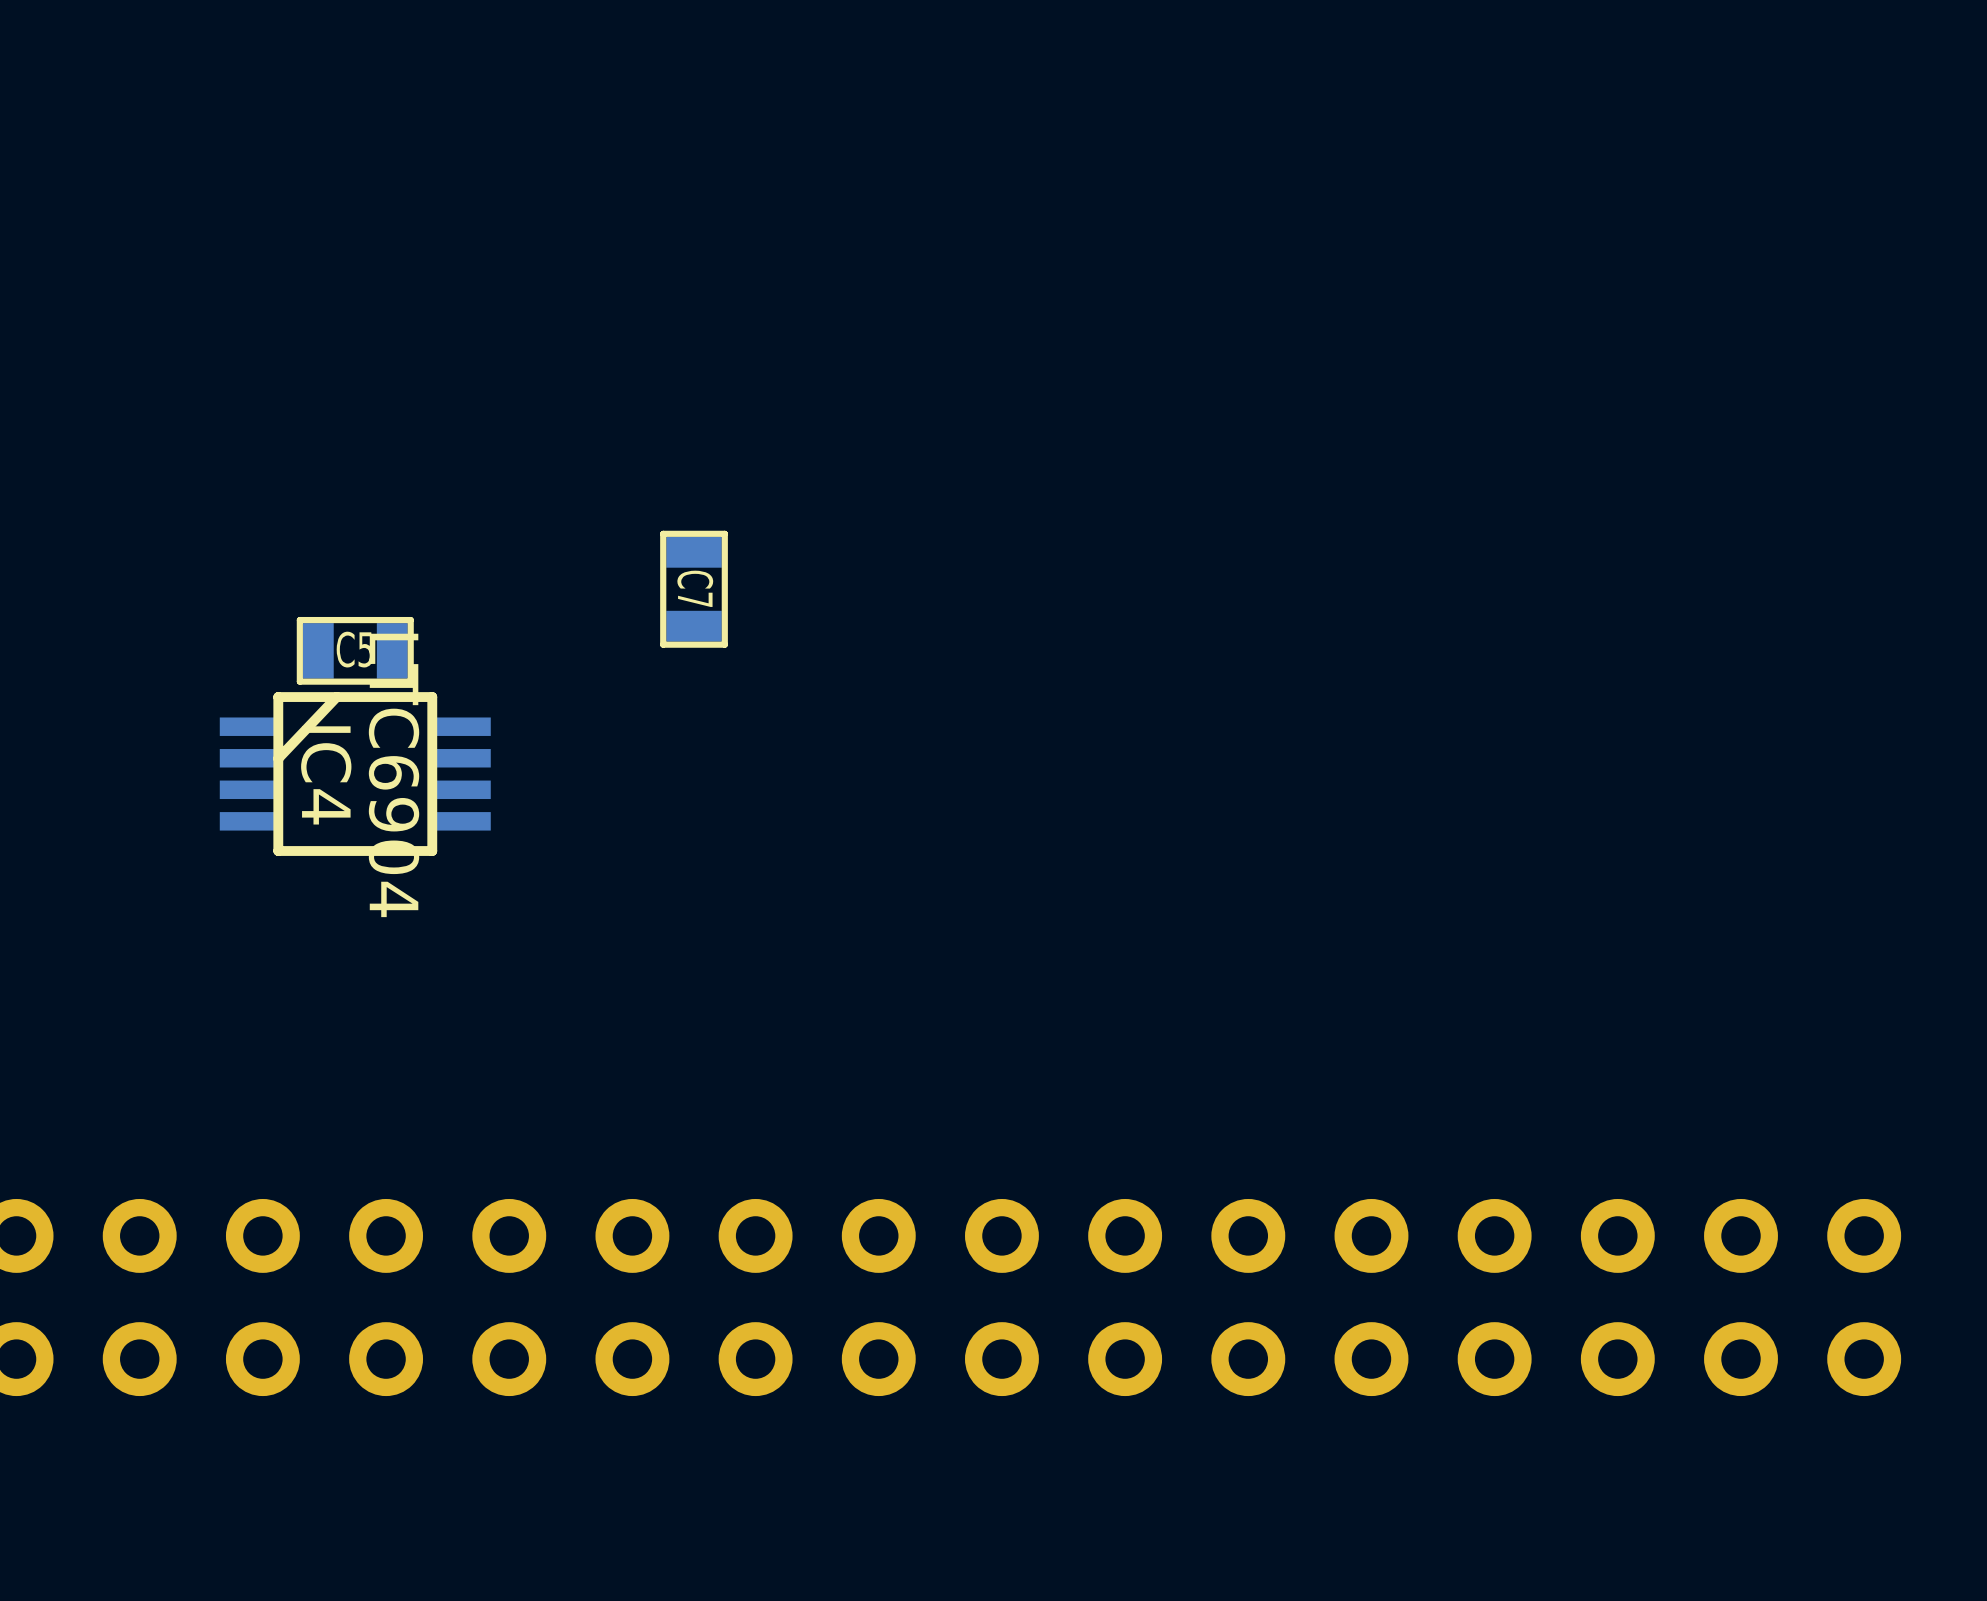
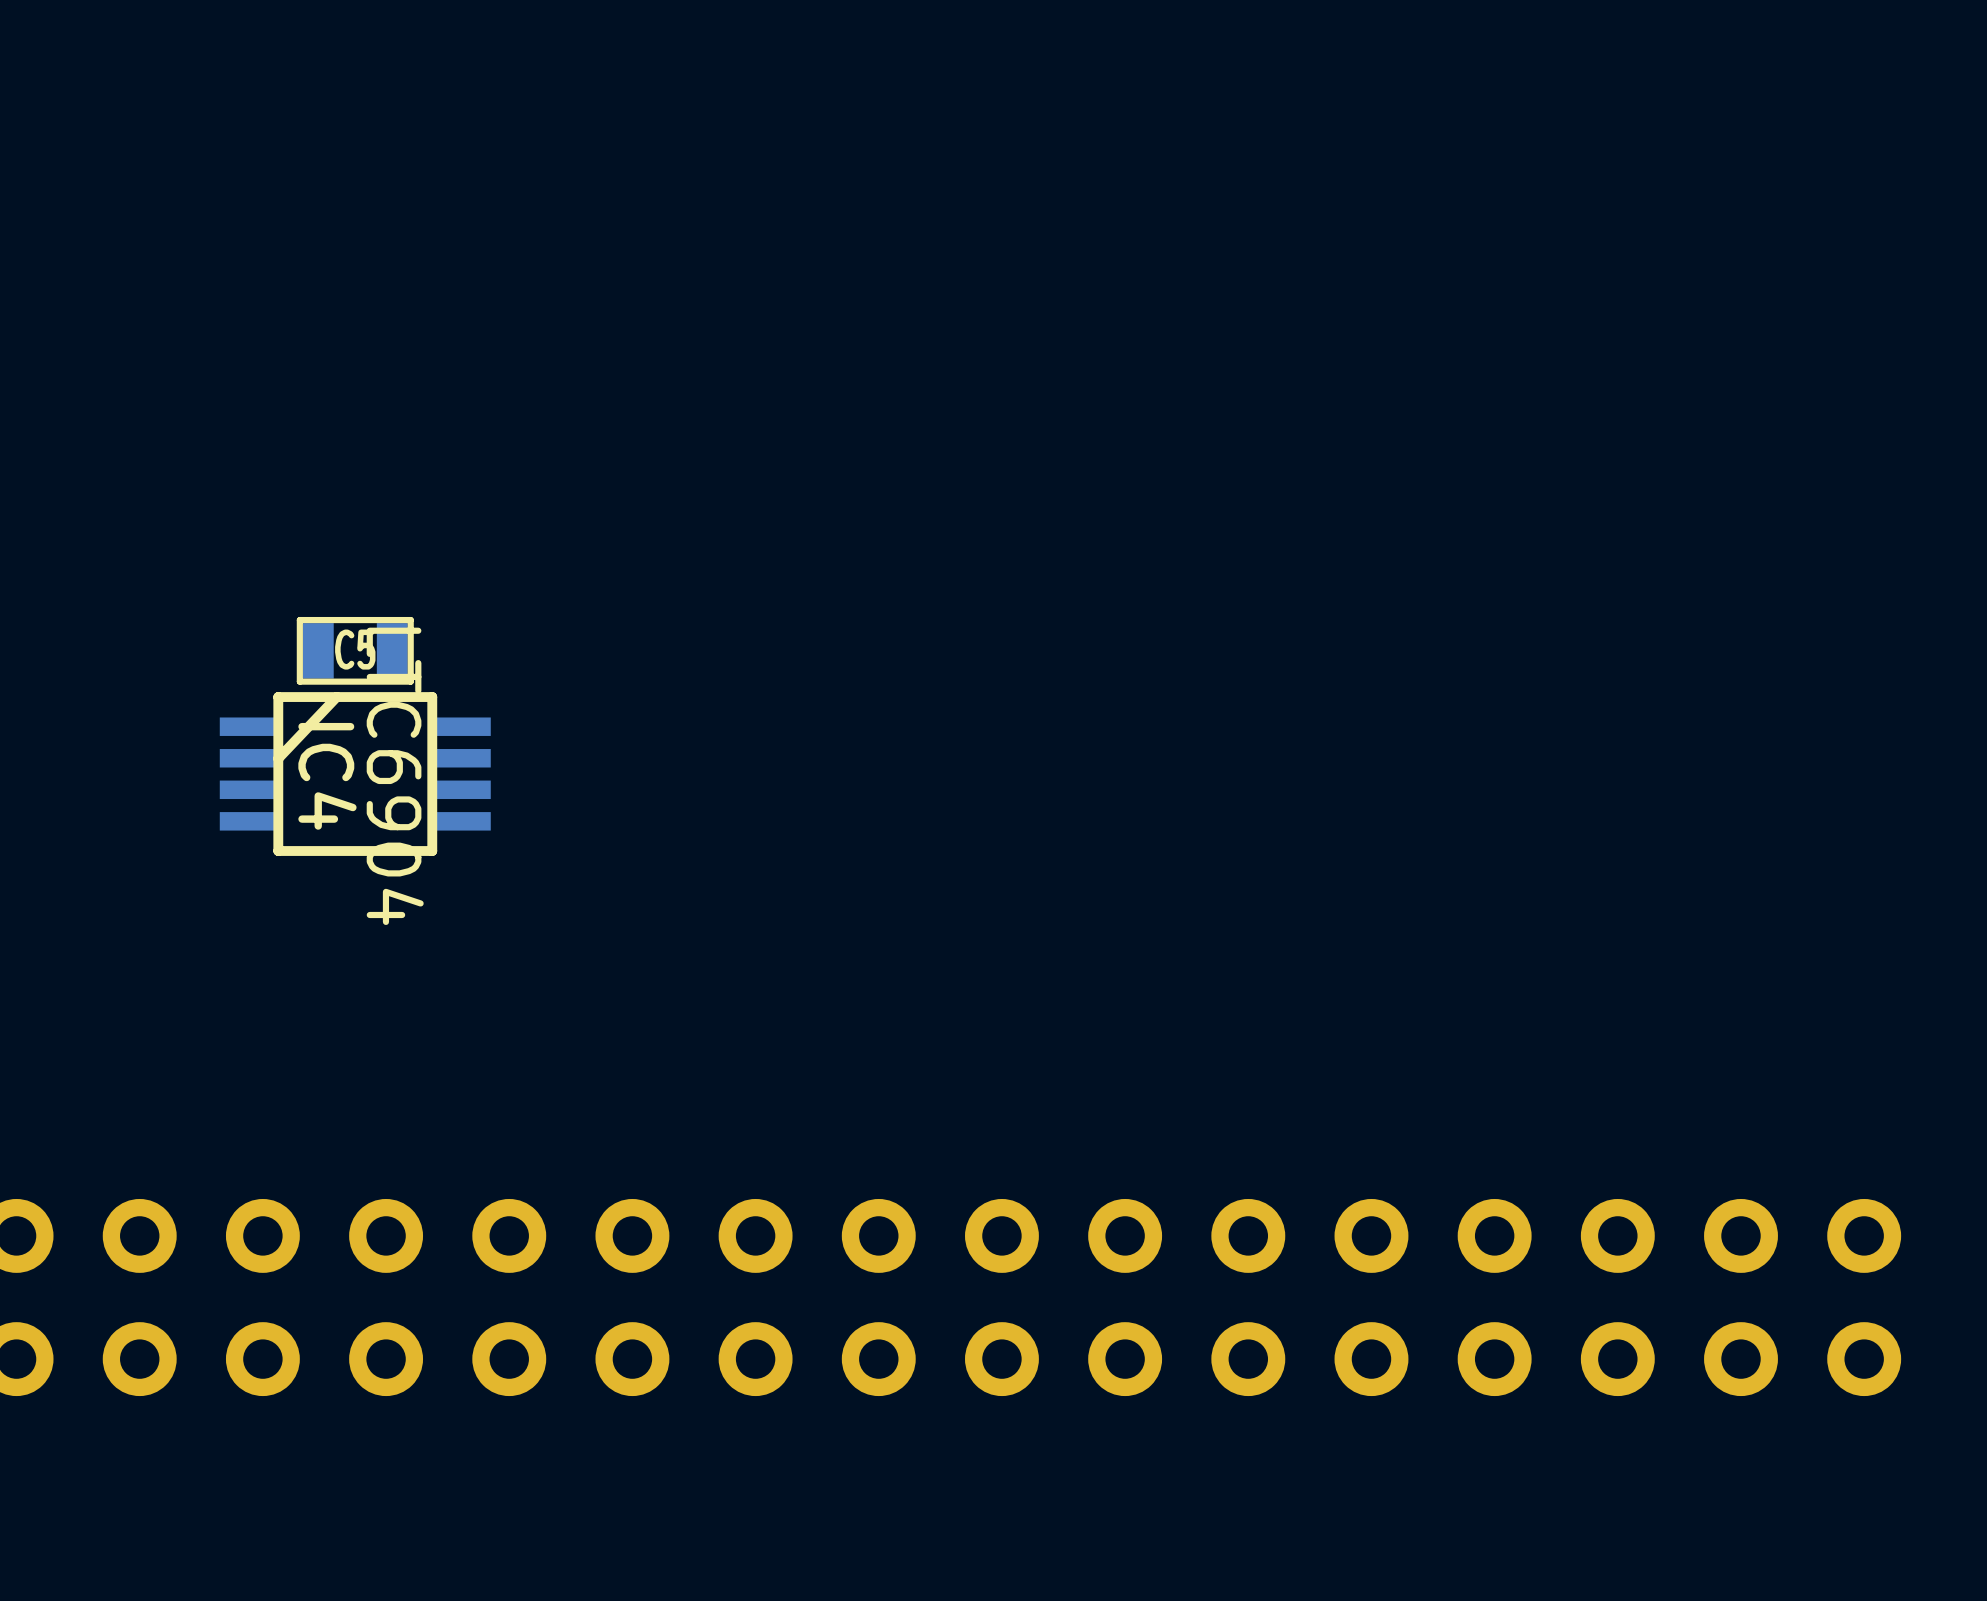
C7: (694, 589) -> none

